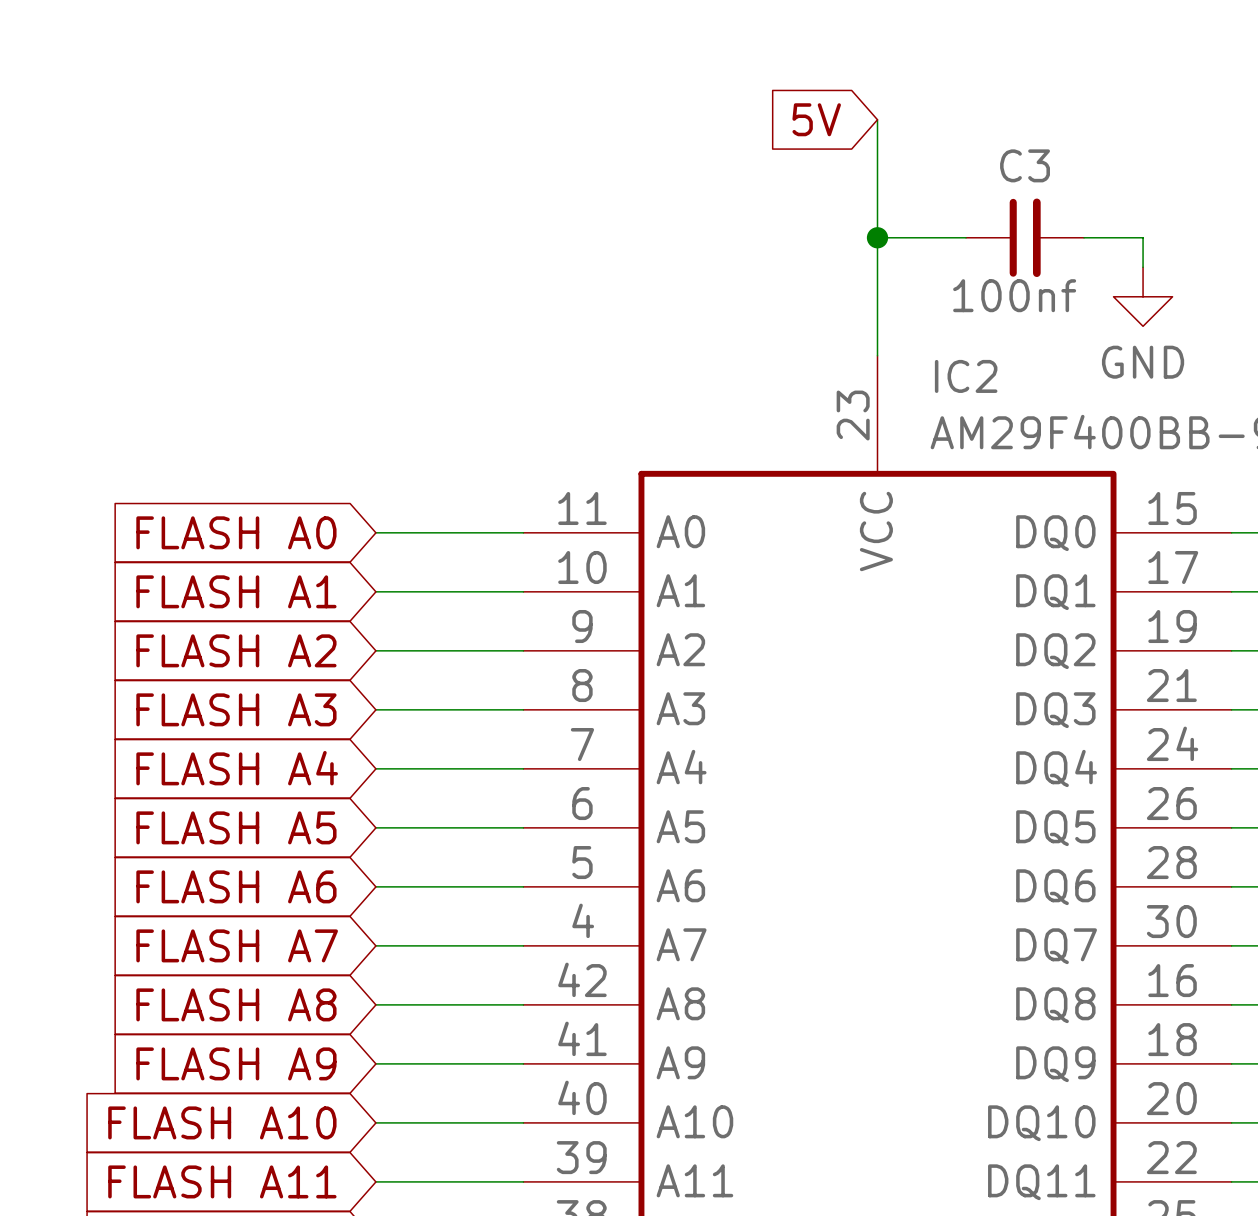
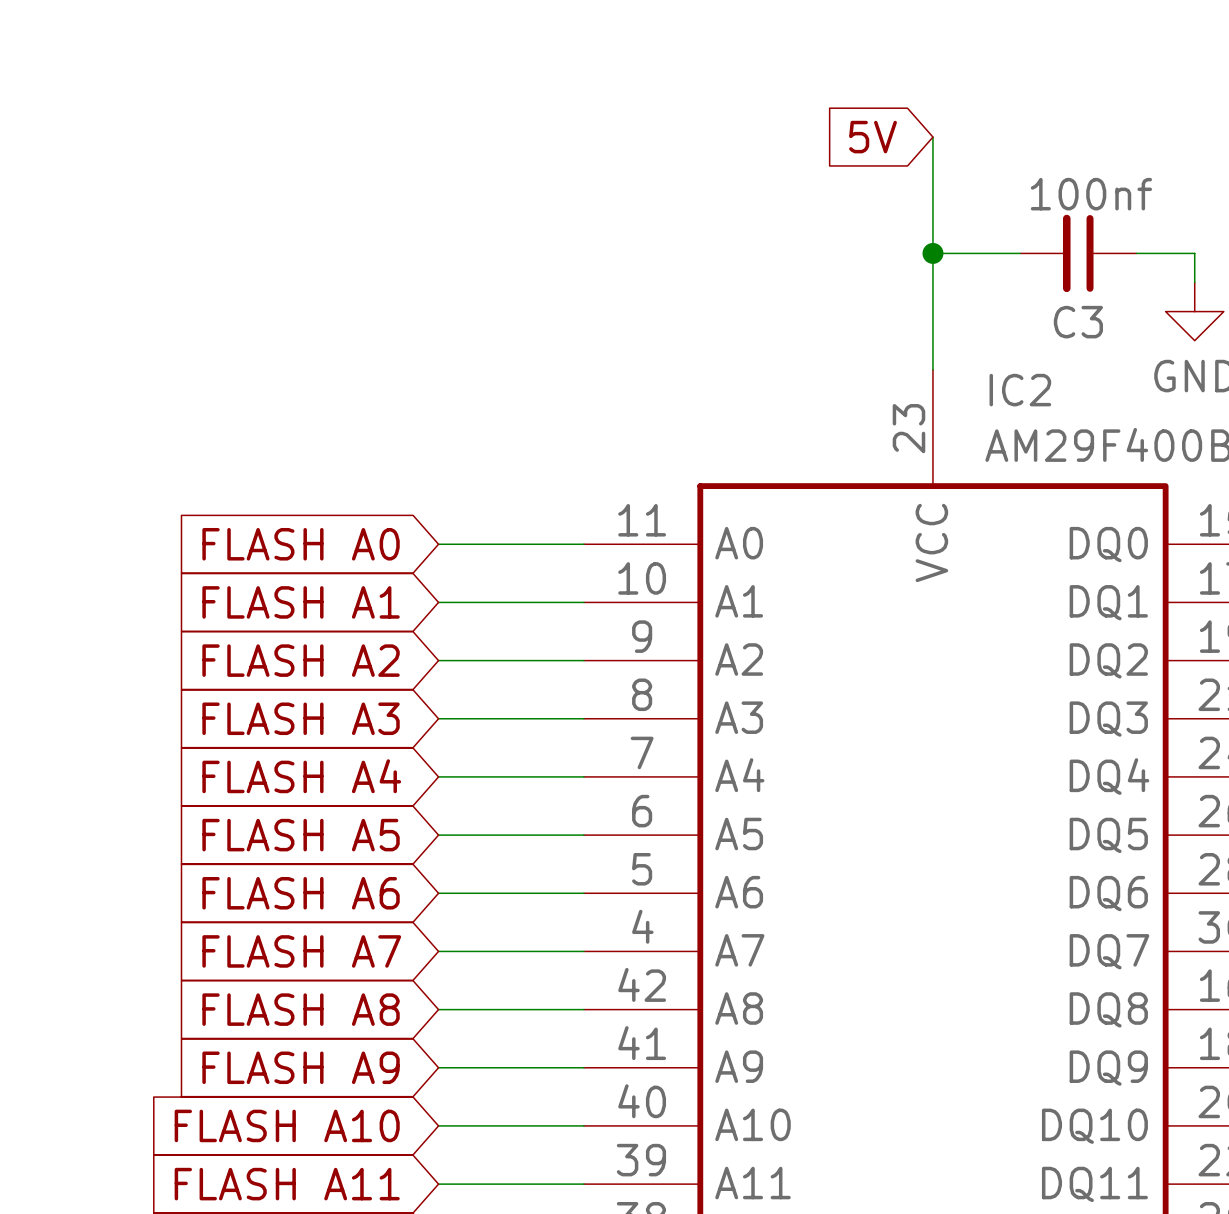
C3 rotation: 0° (1025, 237) -> 180° (1078, 253)

